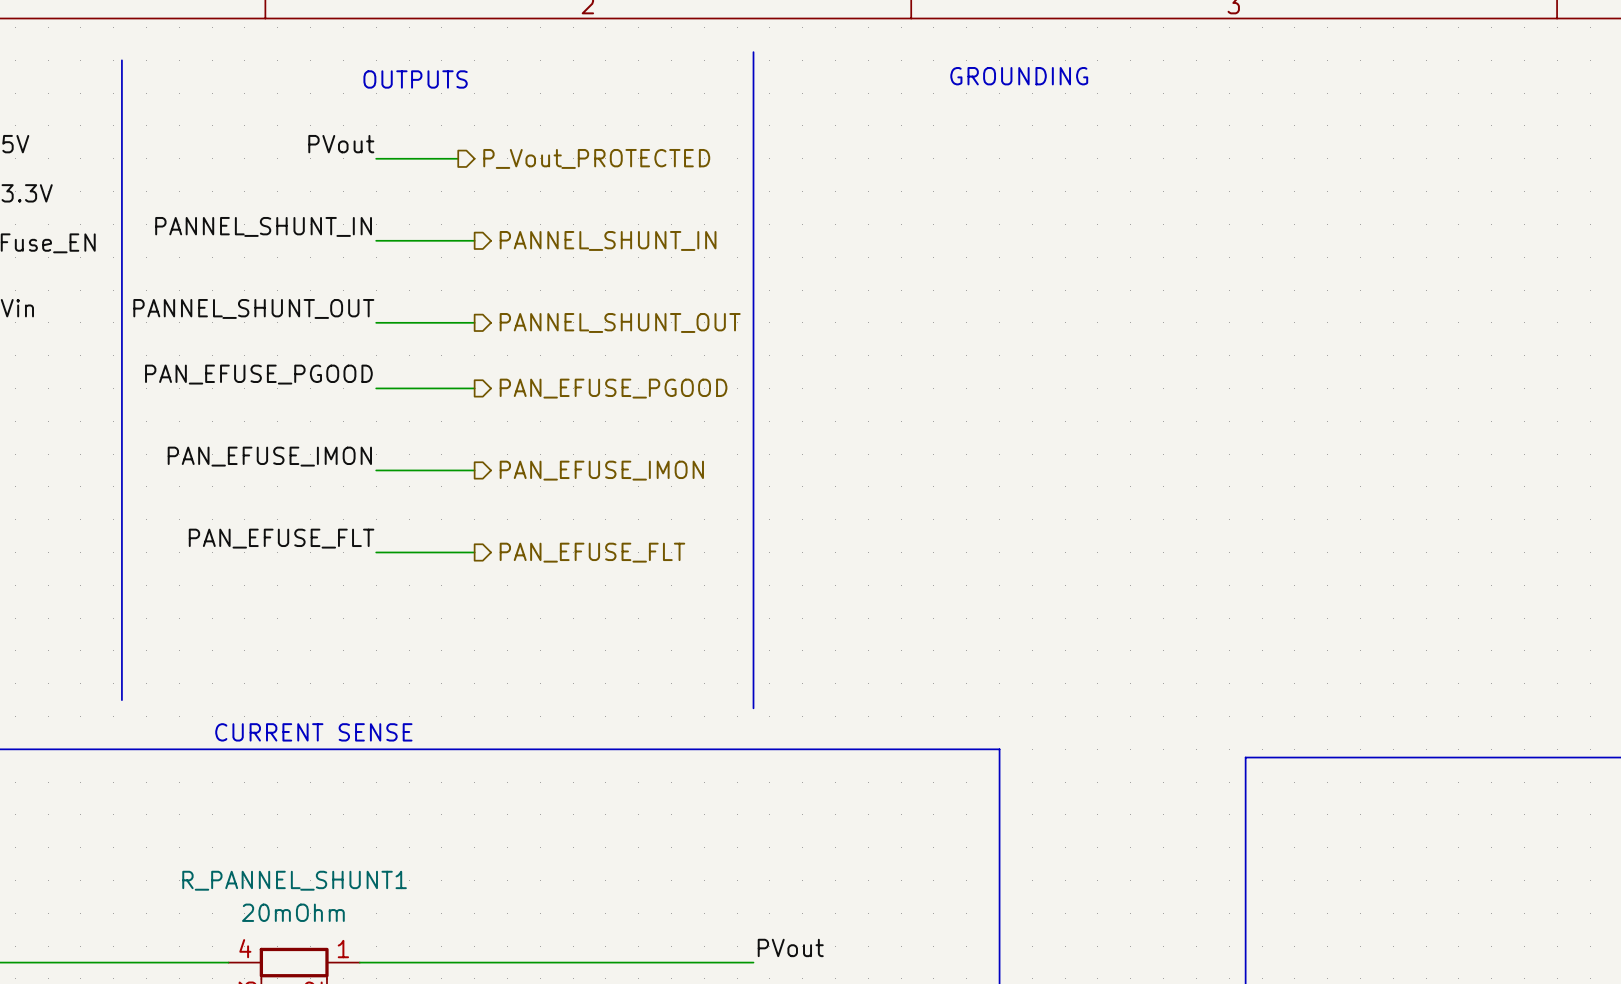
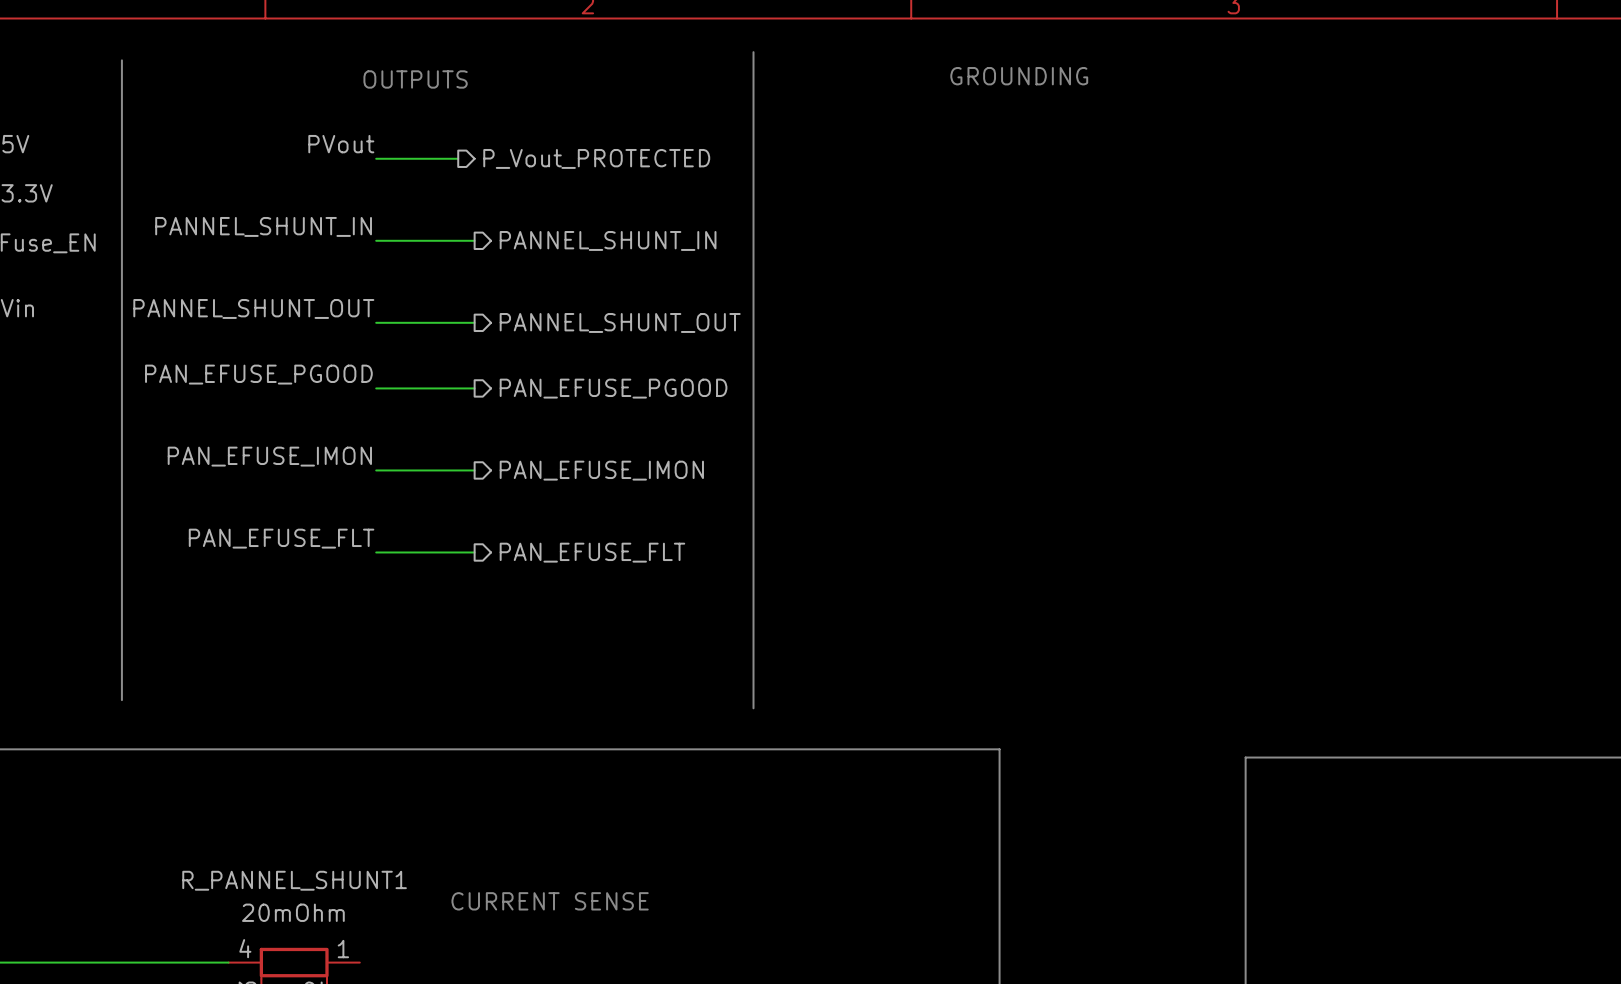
text position: CURRENT SENSE (313, 732) -> CURRENT SENSE (550, 901)
label: PVout (790, 947) -> none
wire: (359, 962) (753, 962) -> none

